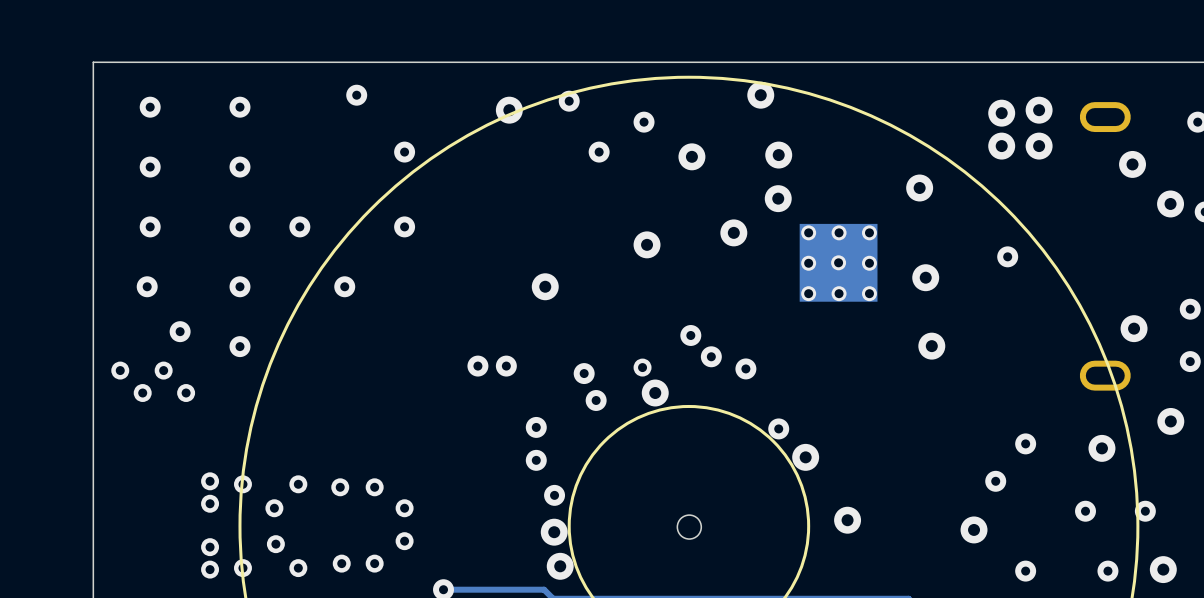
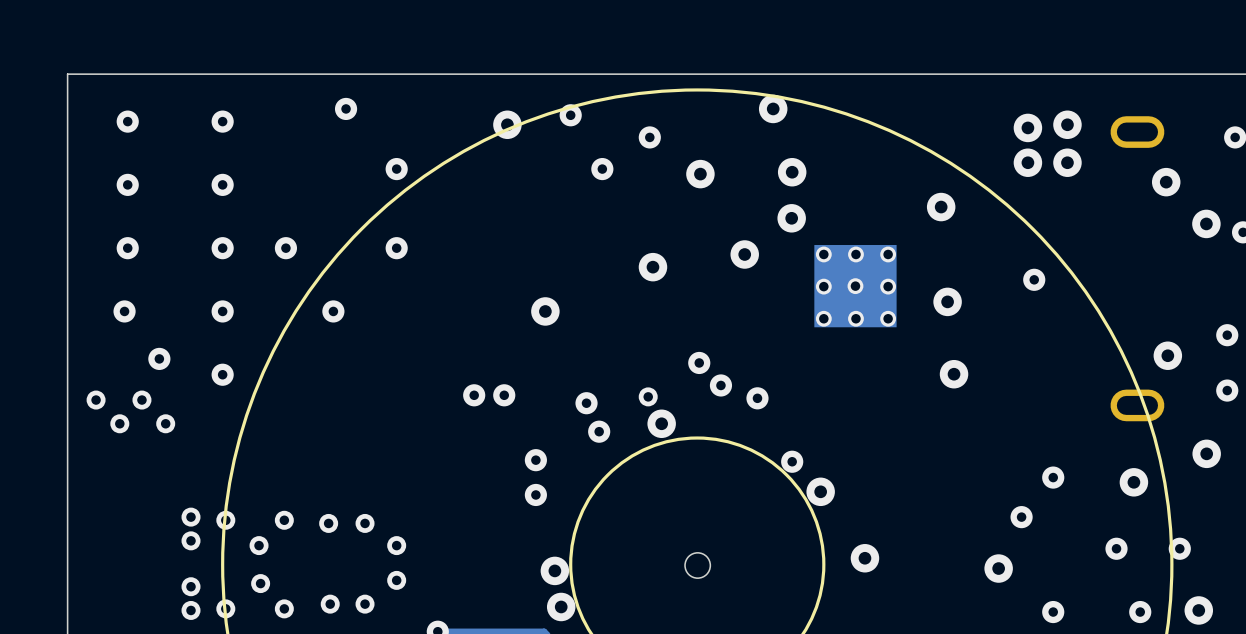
via: (554, 495) -> none

